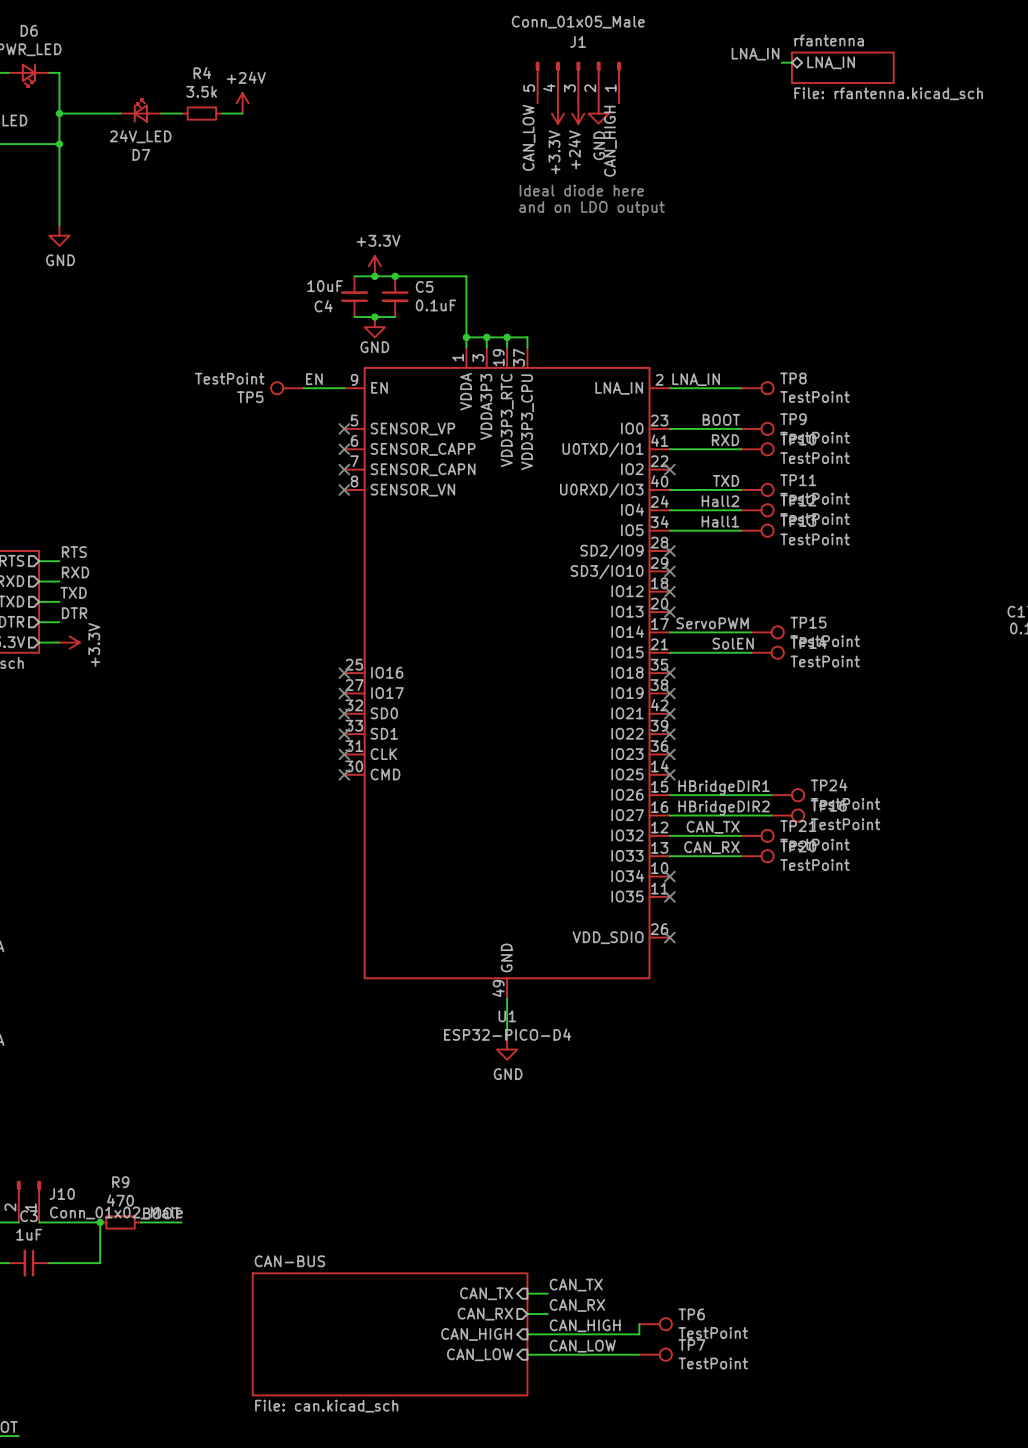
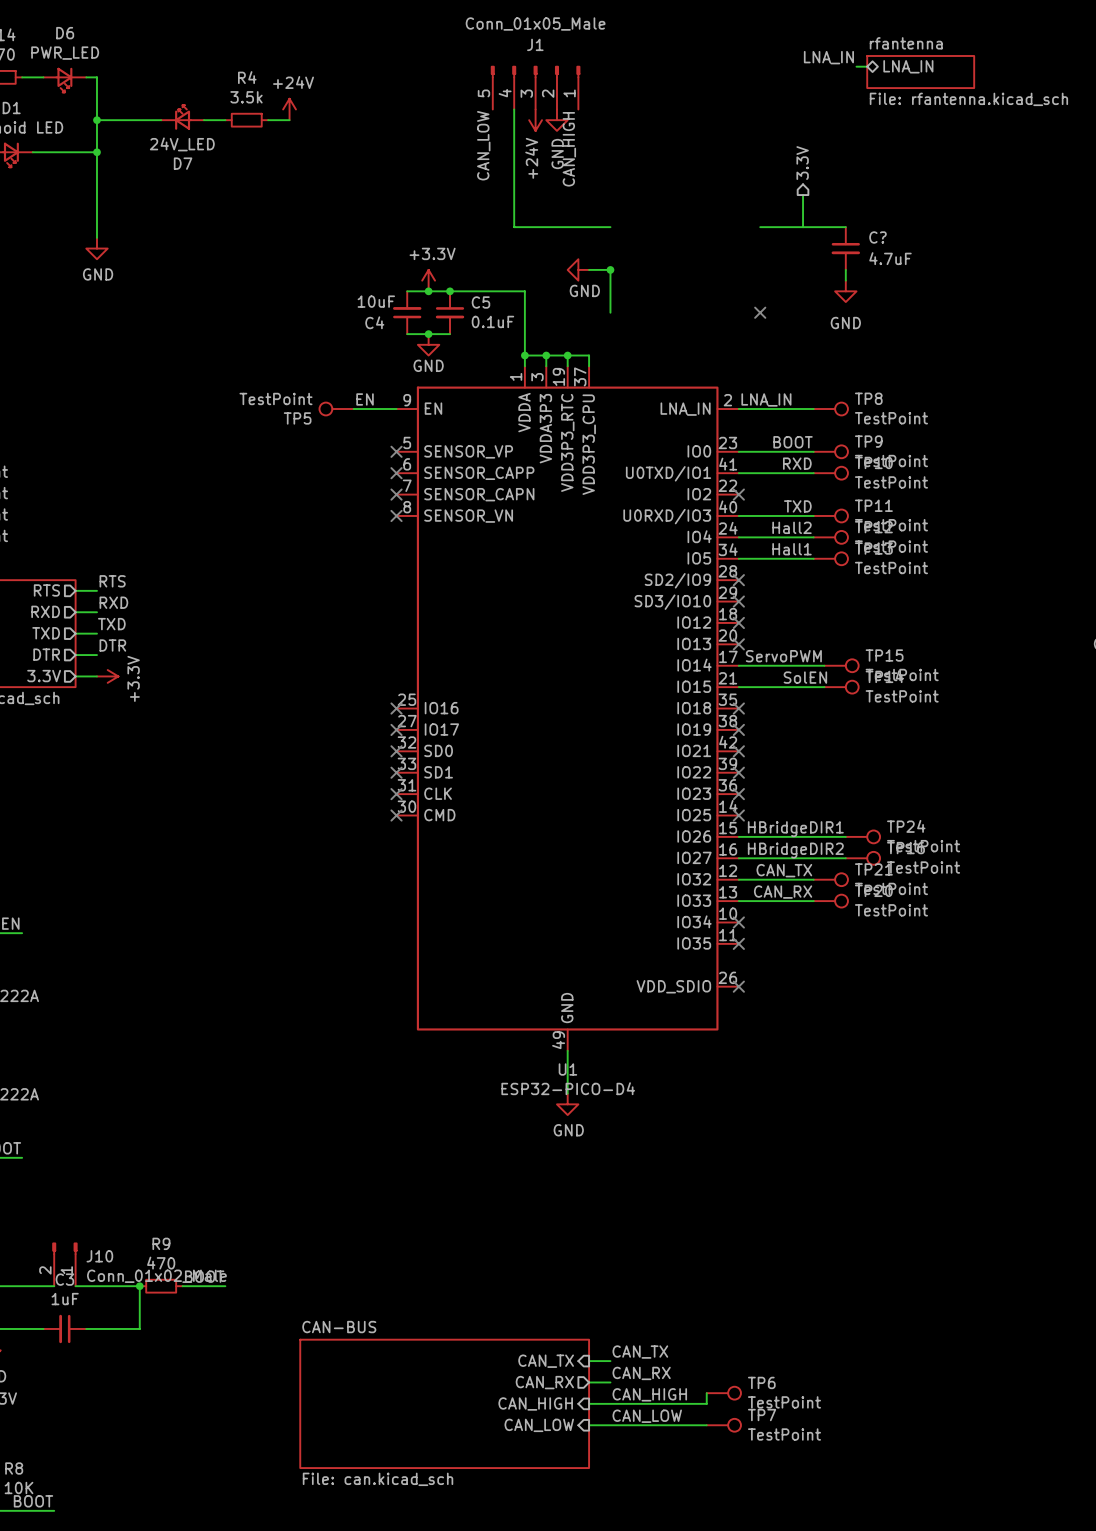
J1 position: (578, 82) -> (535, 87)
wire: none -> (514, 109) (514, 227) (610, 227)
power symbol: none -> GND (556, 120)
power symbol: +3.3V (557, 113) -> none
power symbol position: +24V (578, 113) -> +24V (535, 120)
power symbol: GND (598, 113) -> none
label position: CAN_LOW (529, 137) -> CAN_LOW (483, 145)
label position: CAN_HIGH (610, 141) -> CAN_HIGH (569, 149)
hierarchical label: none -> 3.3V (802, 163)
wire: none -> (803, 195) (803, 227)
text: Ideal diode here (581, 190) -> none
text: and on LDO output (591, 208) -> none
wire: none -> (760, 227) (845, 227)
C?: none -> 4.7uF (845, 248)
power symbol: none -> GND (578, 269)
wire: none -> (589, 269) (610, 269) (610, 312)
junction: none -> (610, 269)
wire: none -> (845, 269) (845, 280)
power symbol: none -> GND (845, 291)
no-connect mark: none -> (760, 312)

